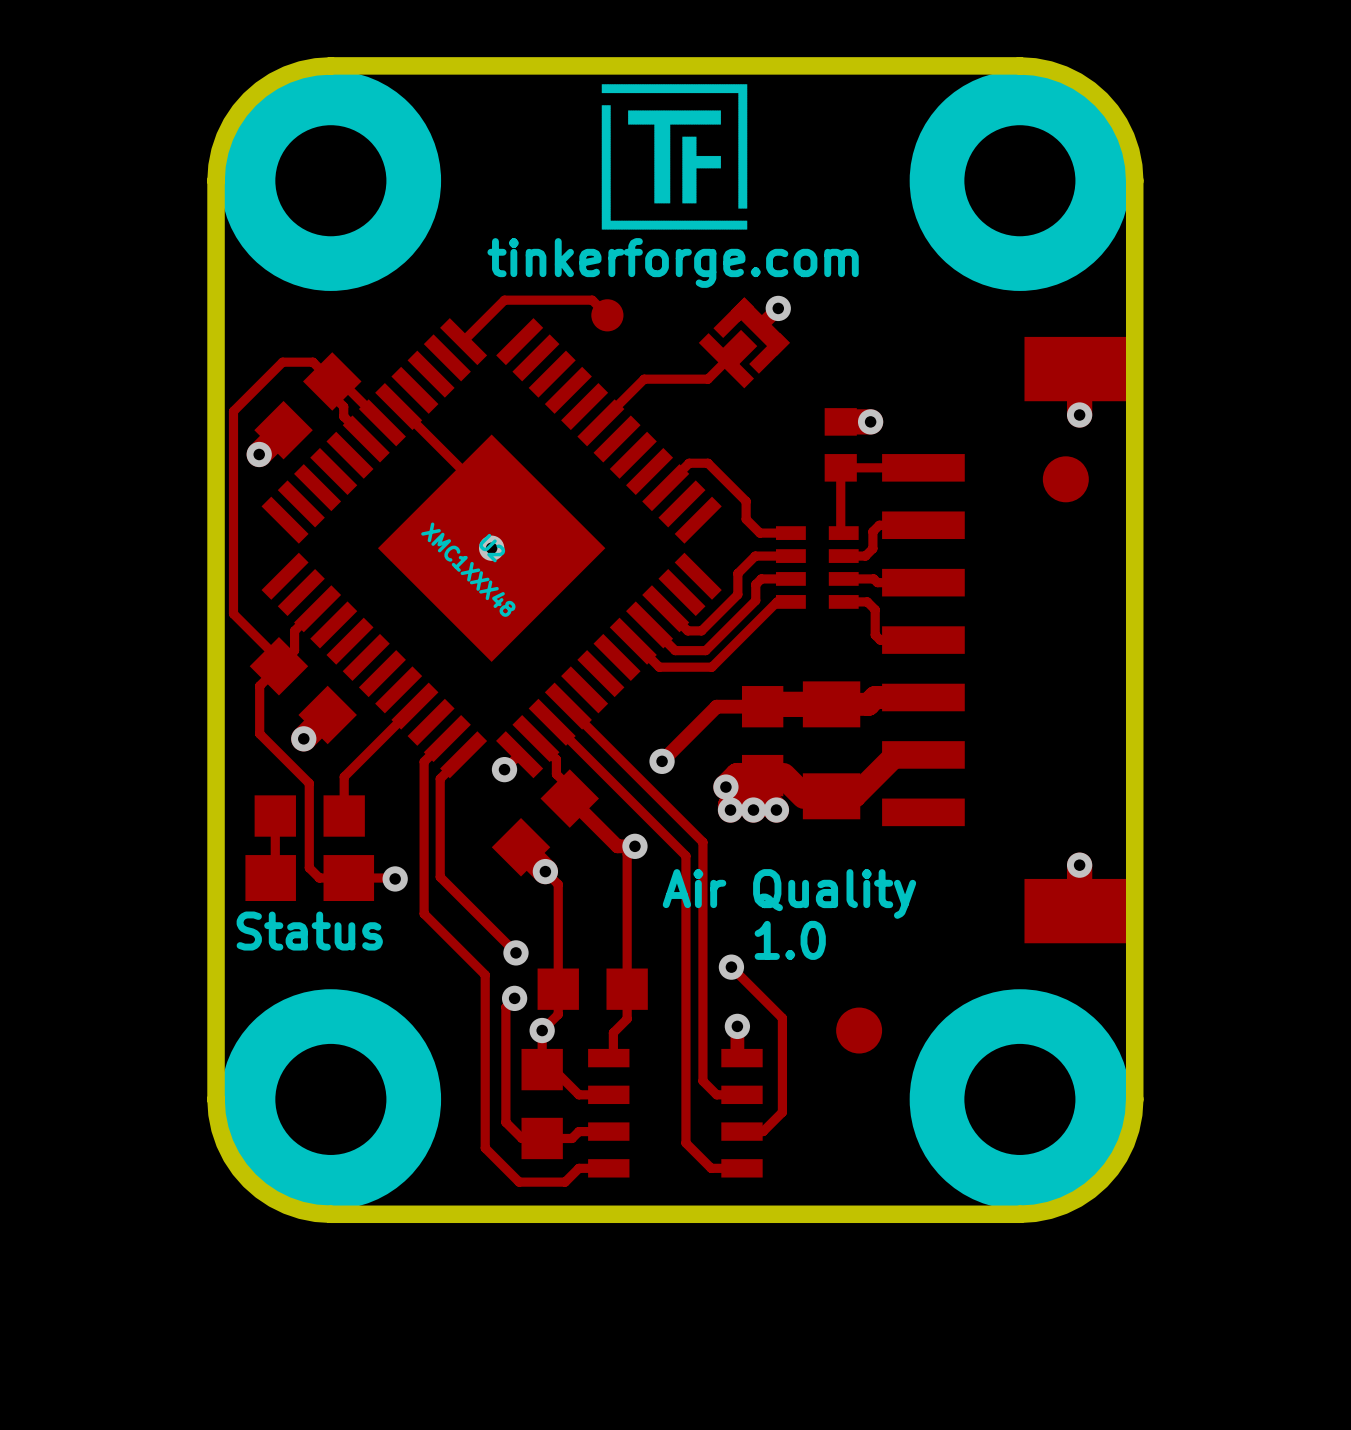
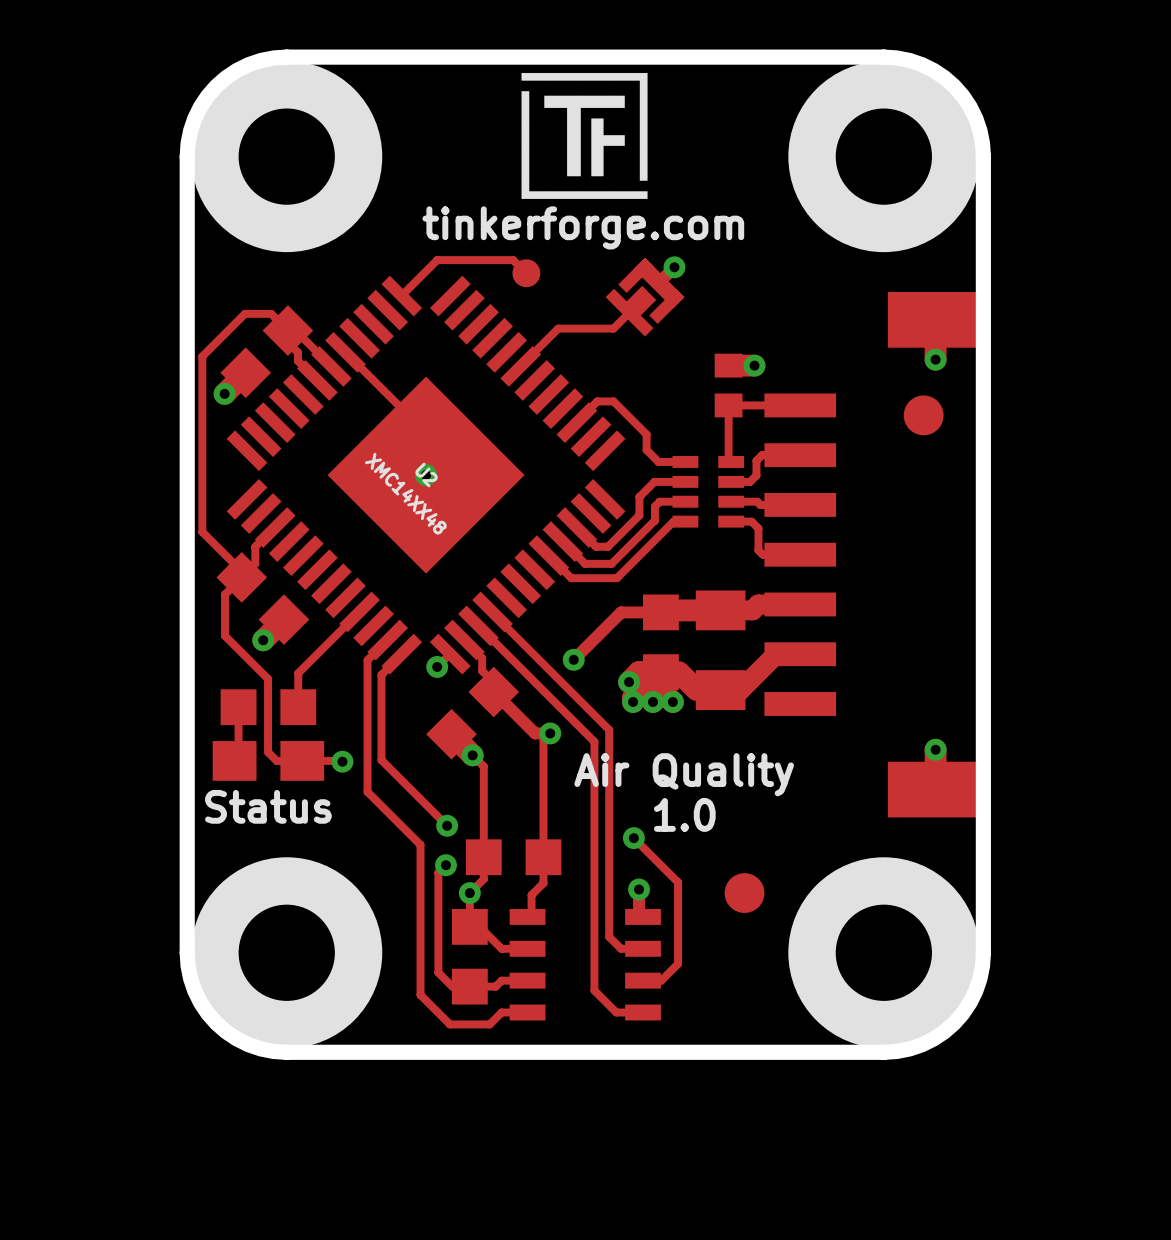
U2 value: XMC1XXX48 (468, 569) -> XMC14XX48 (405, 493)

